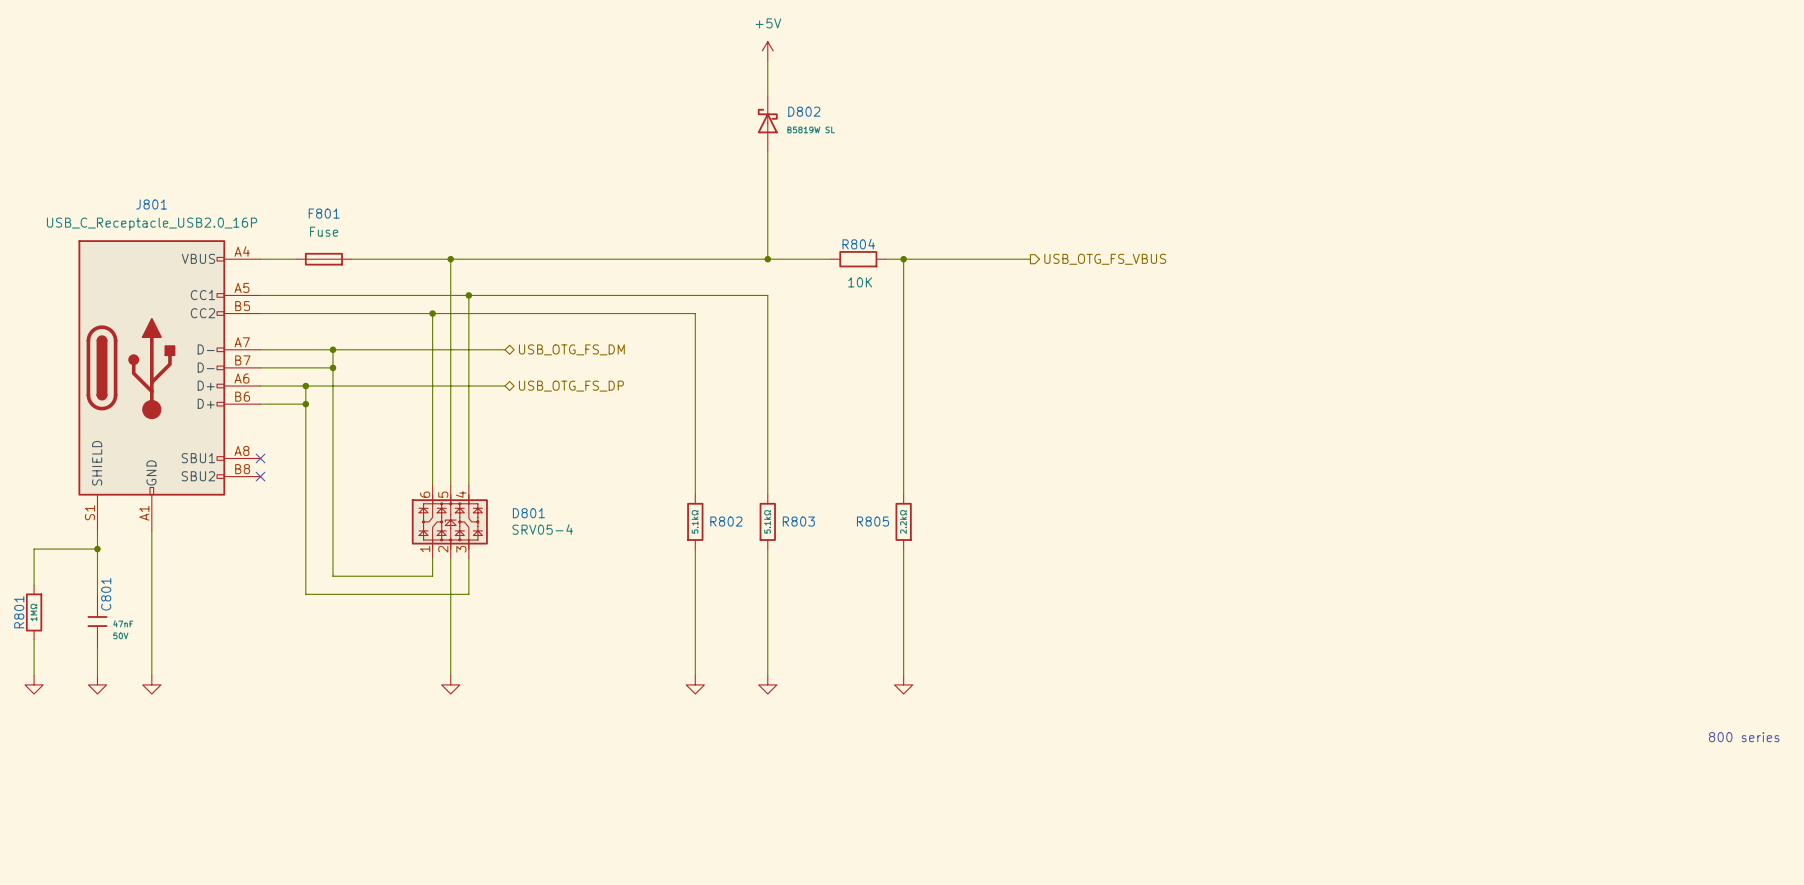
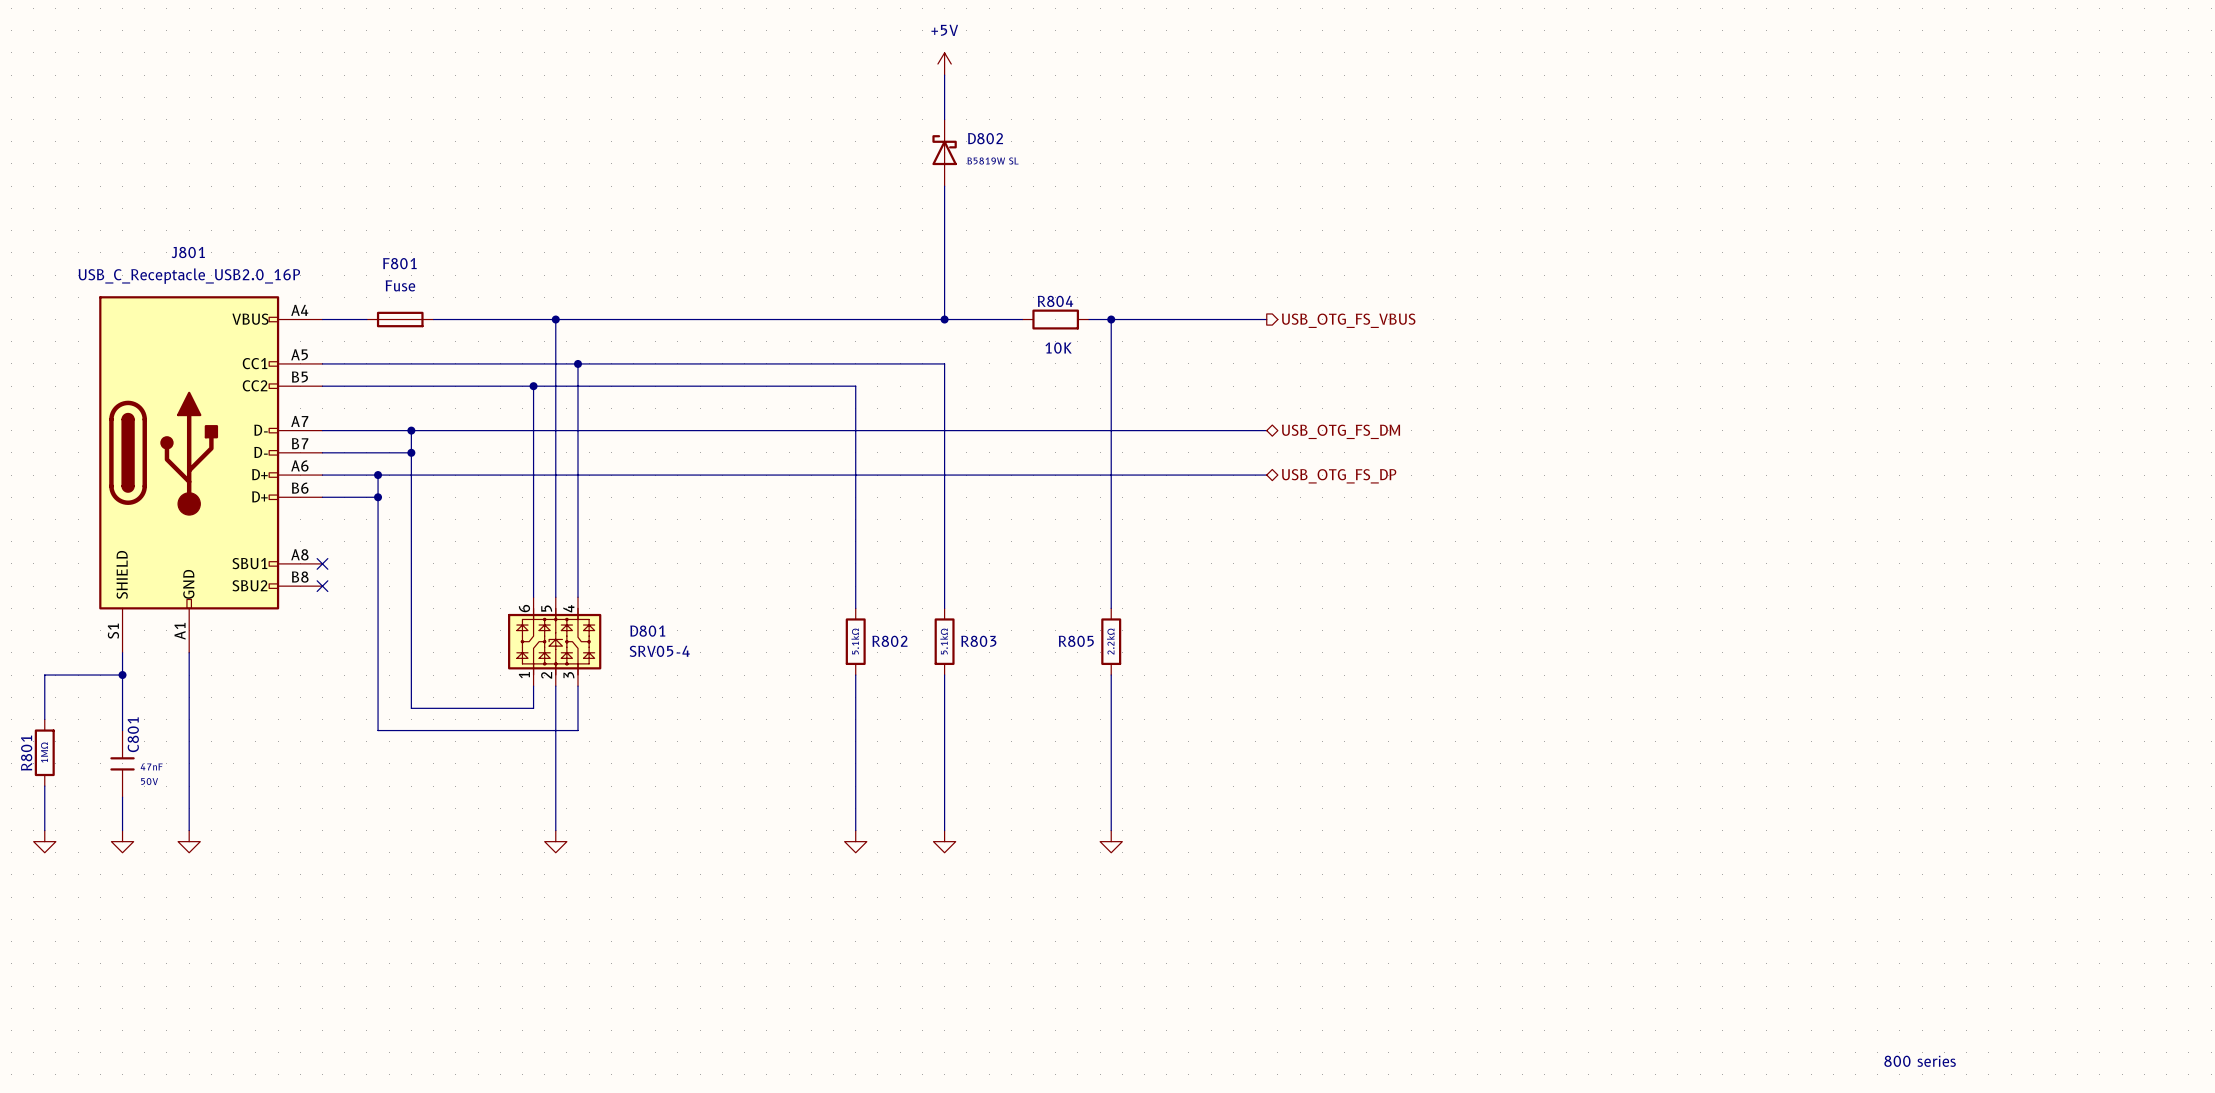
wire: none -> (622, 430) (1266, 430)
hierarchical label: USB_OTG_FS_DM (571, 349) -> none
hierarchical label: none -> USB_OTG_FS_DM (1341, 431)
wire: none -> (622, 475) (1266, 475)
hierarchical label: USB_OTG_FS_DP (571, 386) -> none
hierarchical label: none -> USB_OTG_FS_DP (1339, 476)
text: 800 series (1744, 737) -> none
text: none -> 800 series (1920, 1061)

